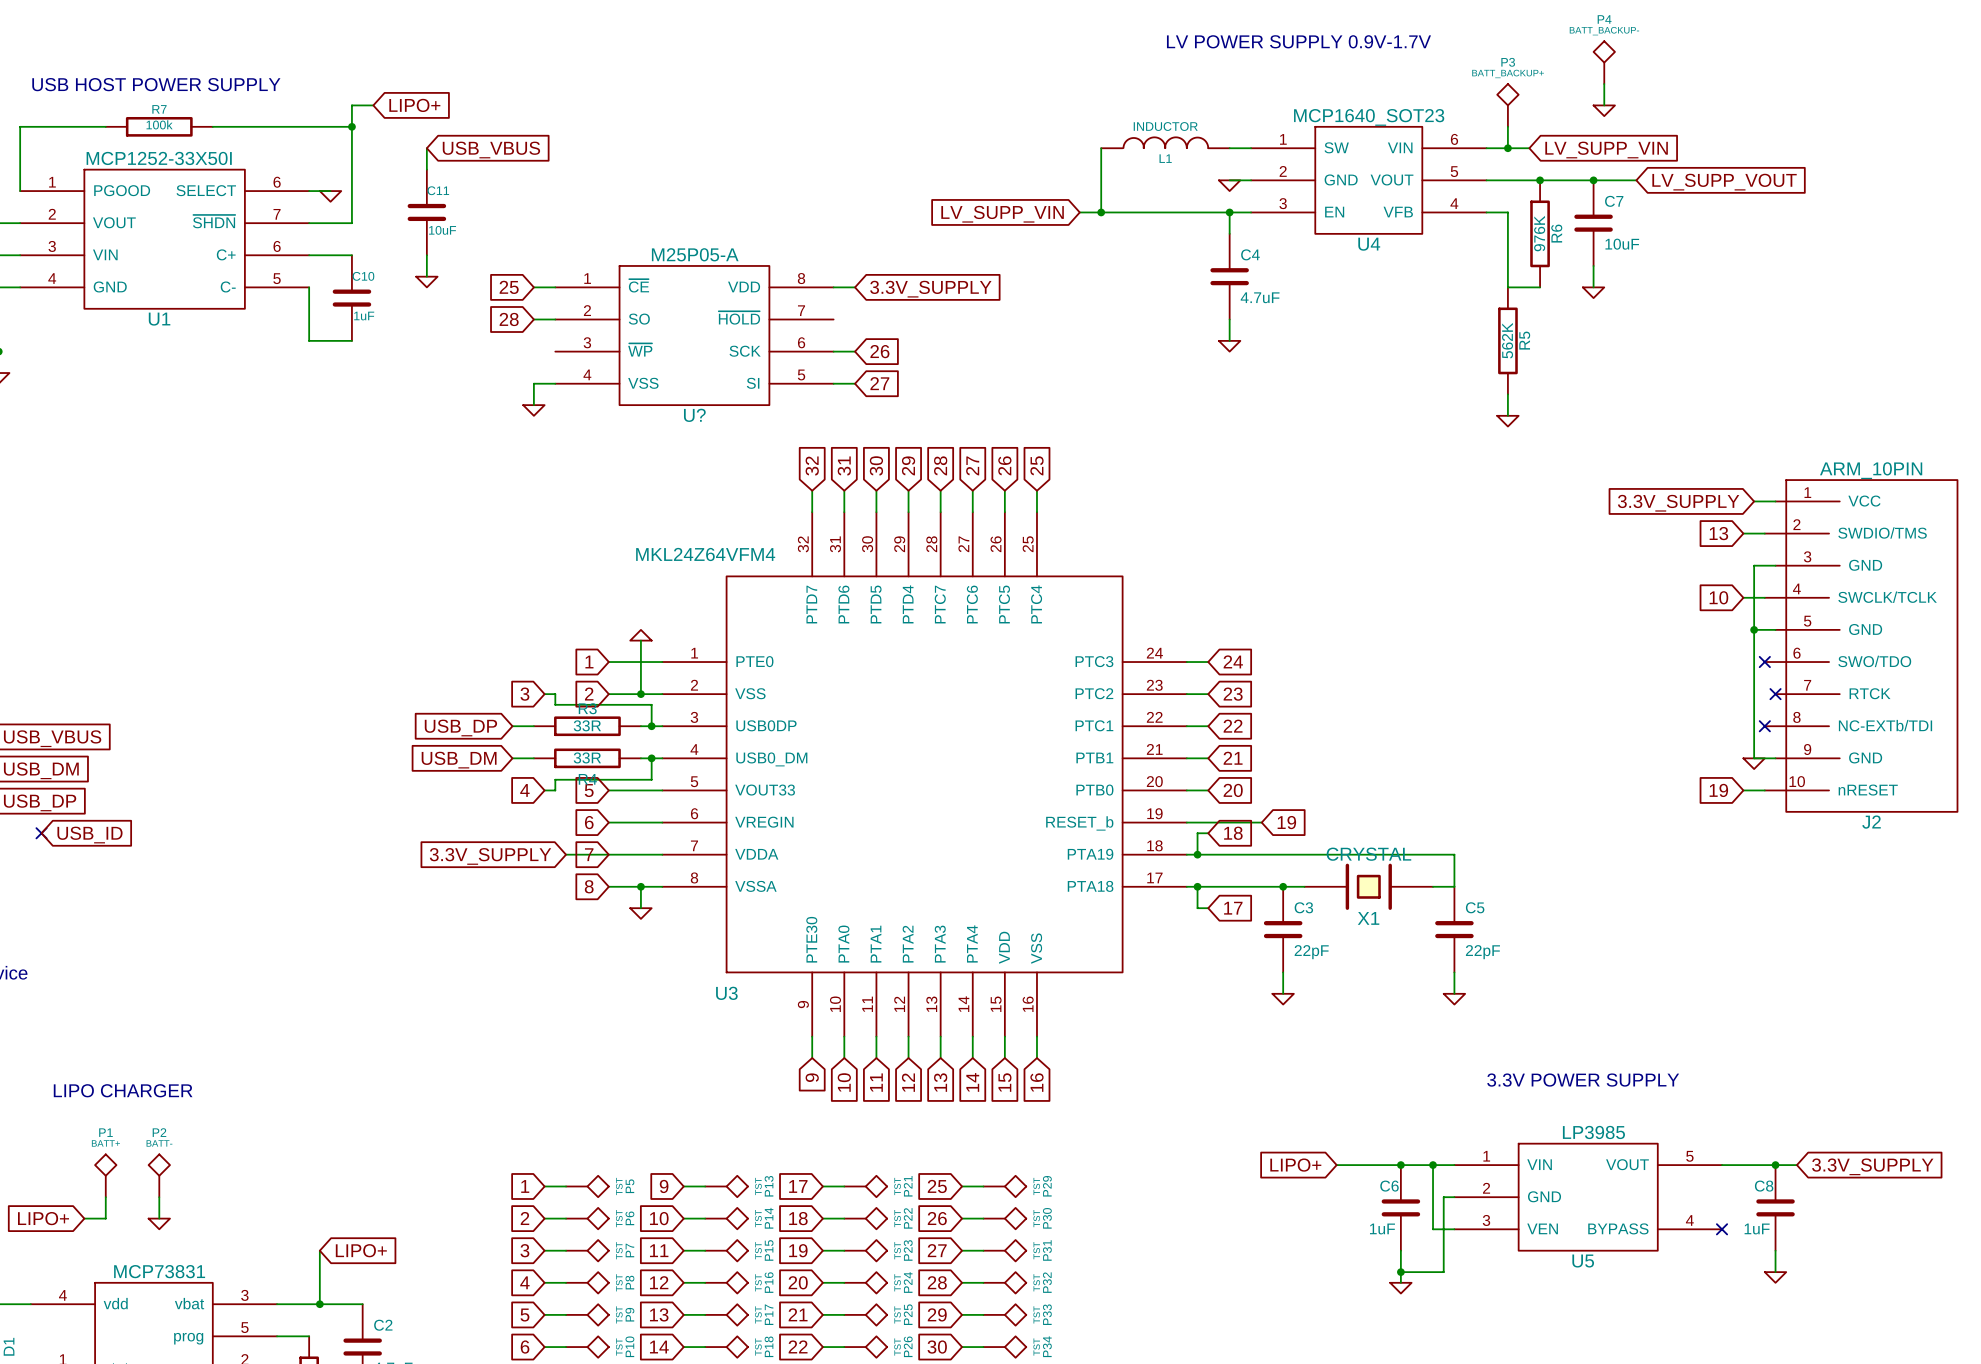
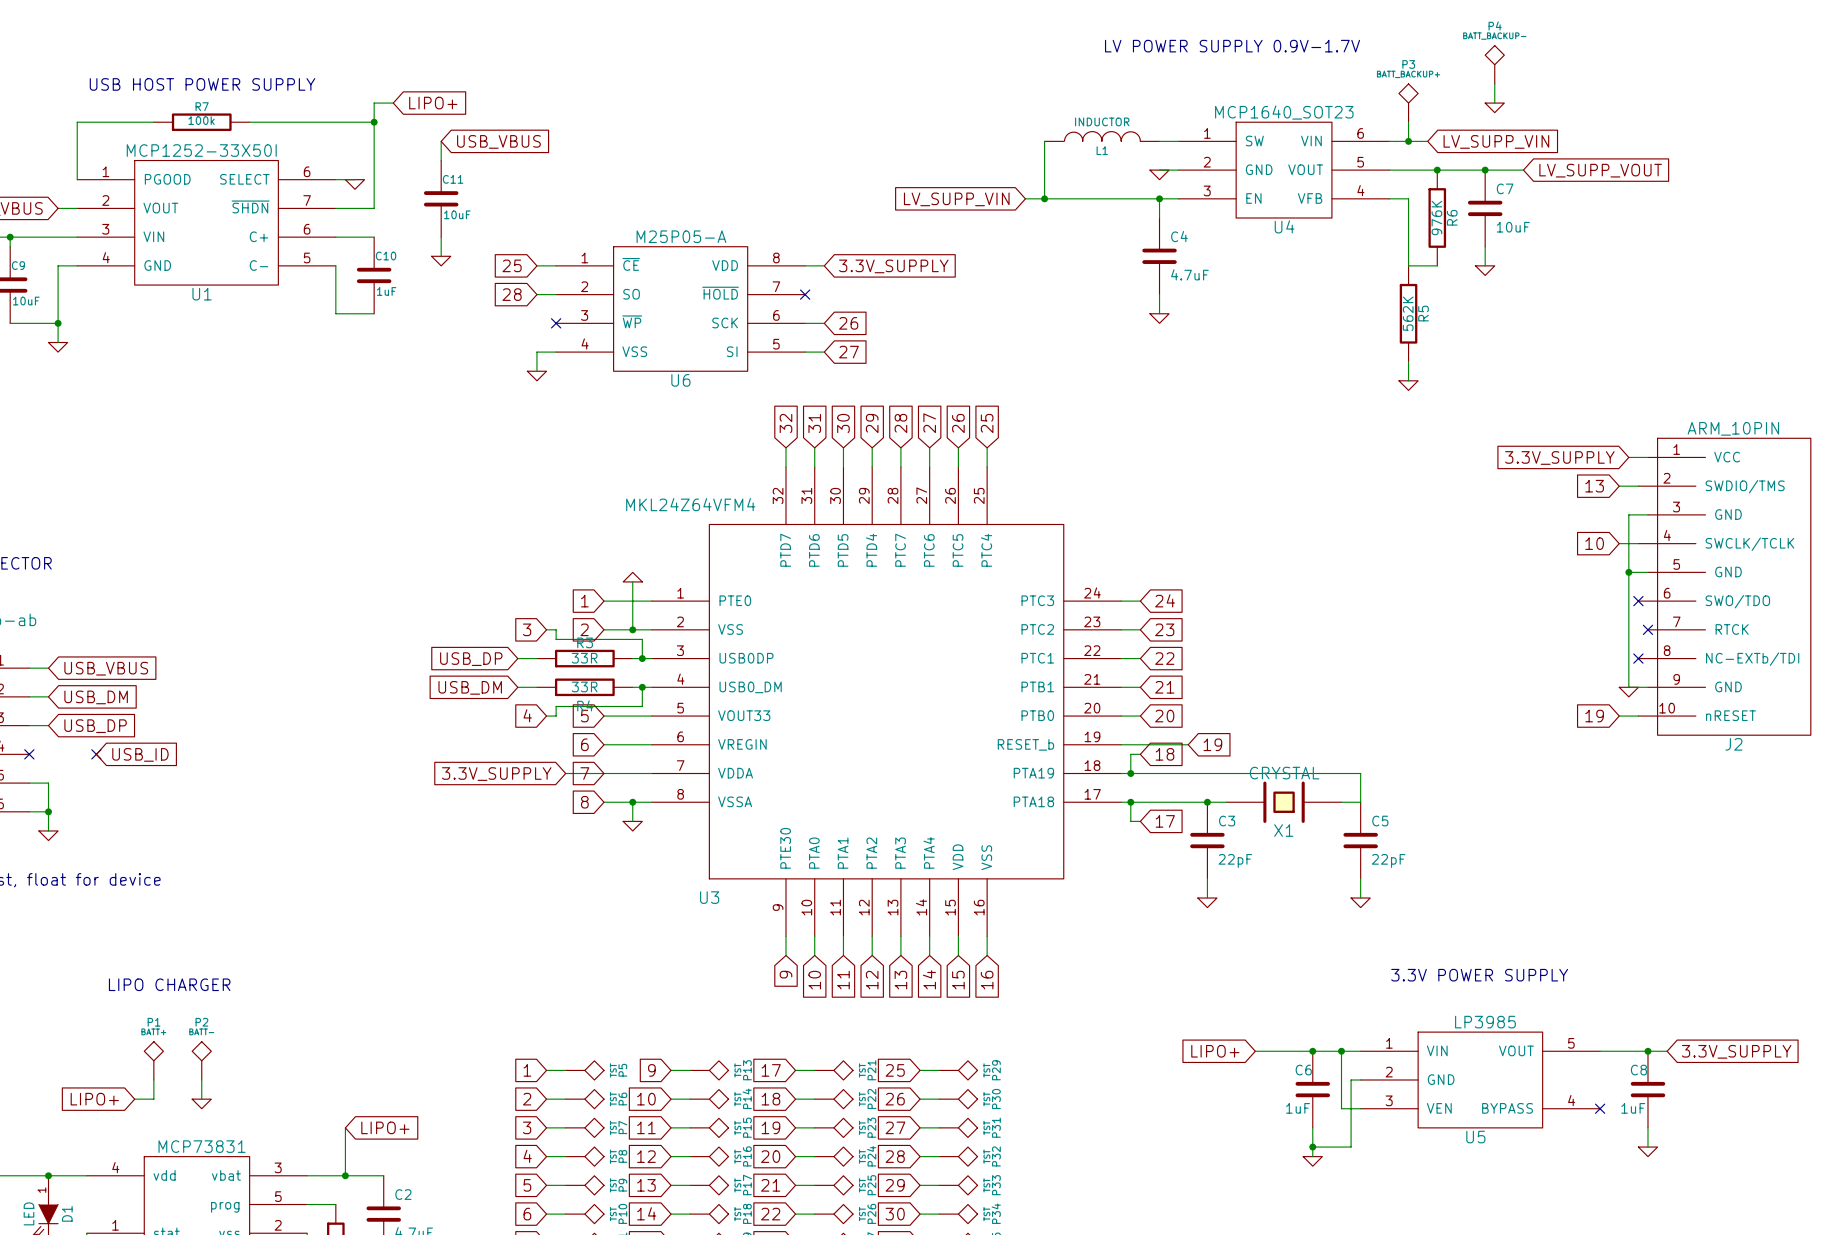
no-connect mark: none -> (805, 294)
no-connect mark: none -> (556, 323)
U? name: U? (694, 415) -> U6 (680, 380)

